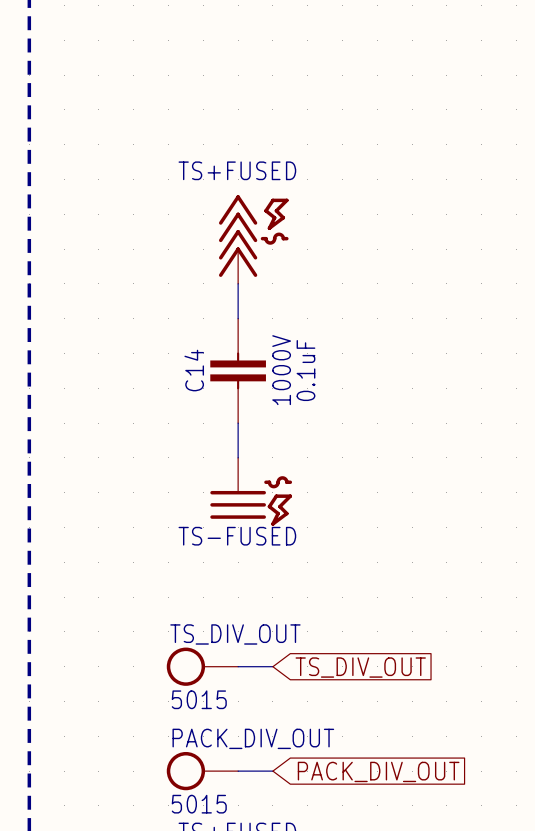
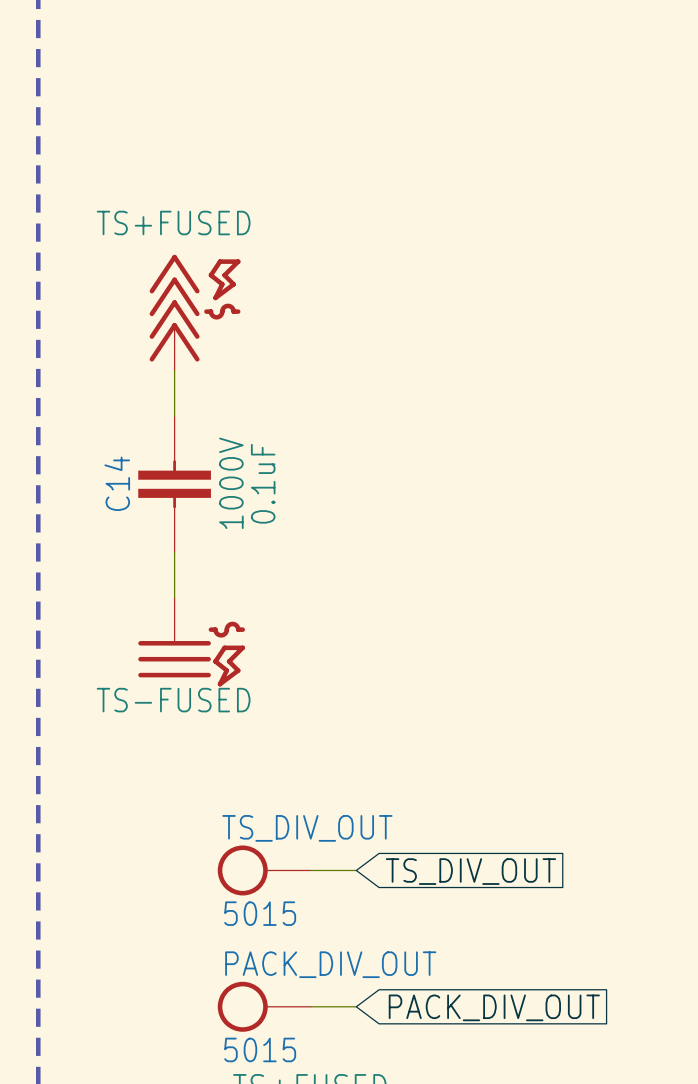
power symbol position: TS+FUSED (253, 239) -> TS+FUSED (195, 312)
wire: (238, 283) (238, 318) -> (174, 370) (174, 416)
C14 position: (238, 370) -> (174, 484)
wire: (238, 423) (238, 457) -> (174, 552) (174, 597)
power symbol position: TS-FUSED (251, 491) -> TS-FUSED (191, 642)

